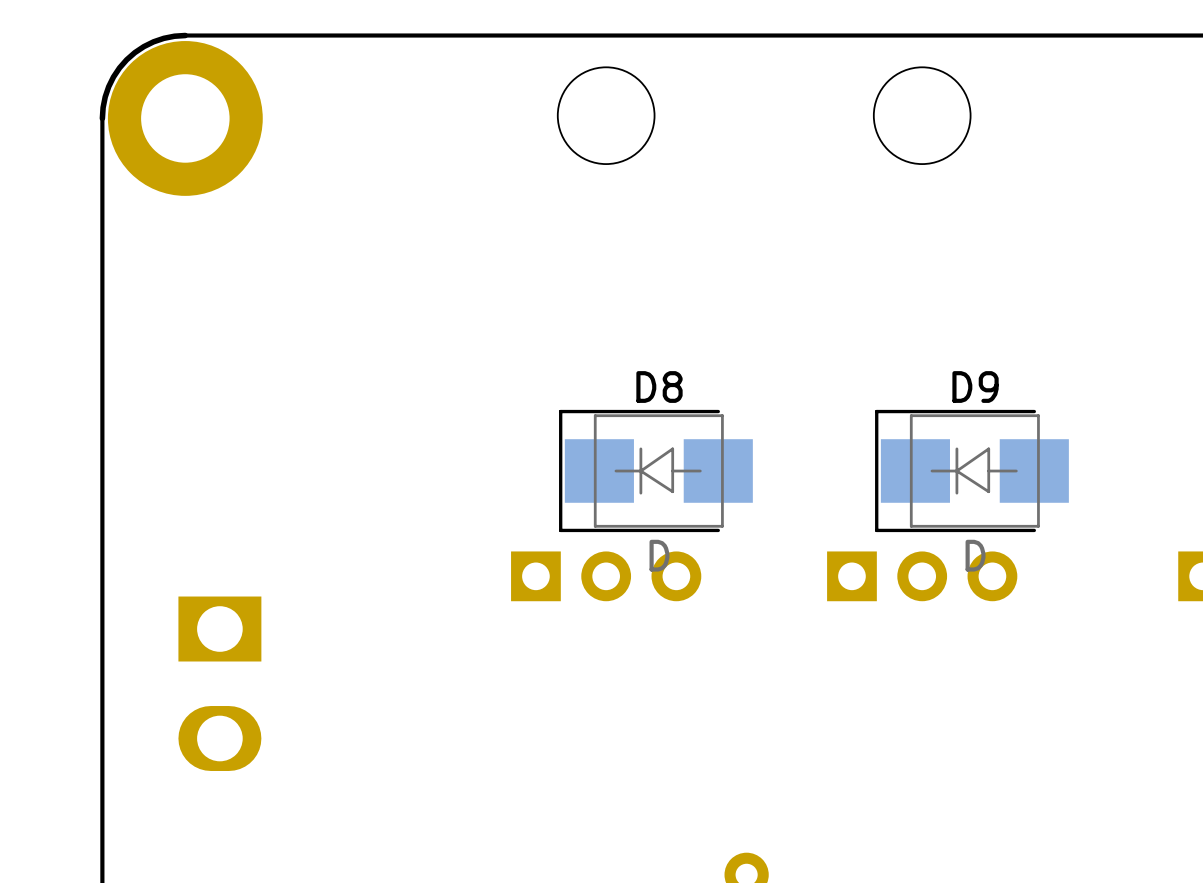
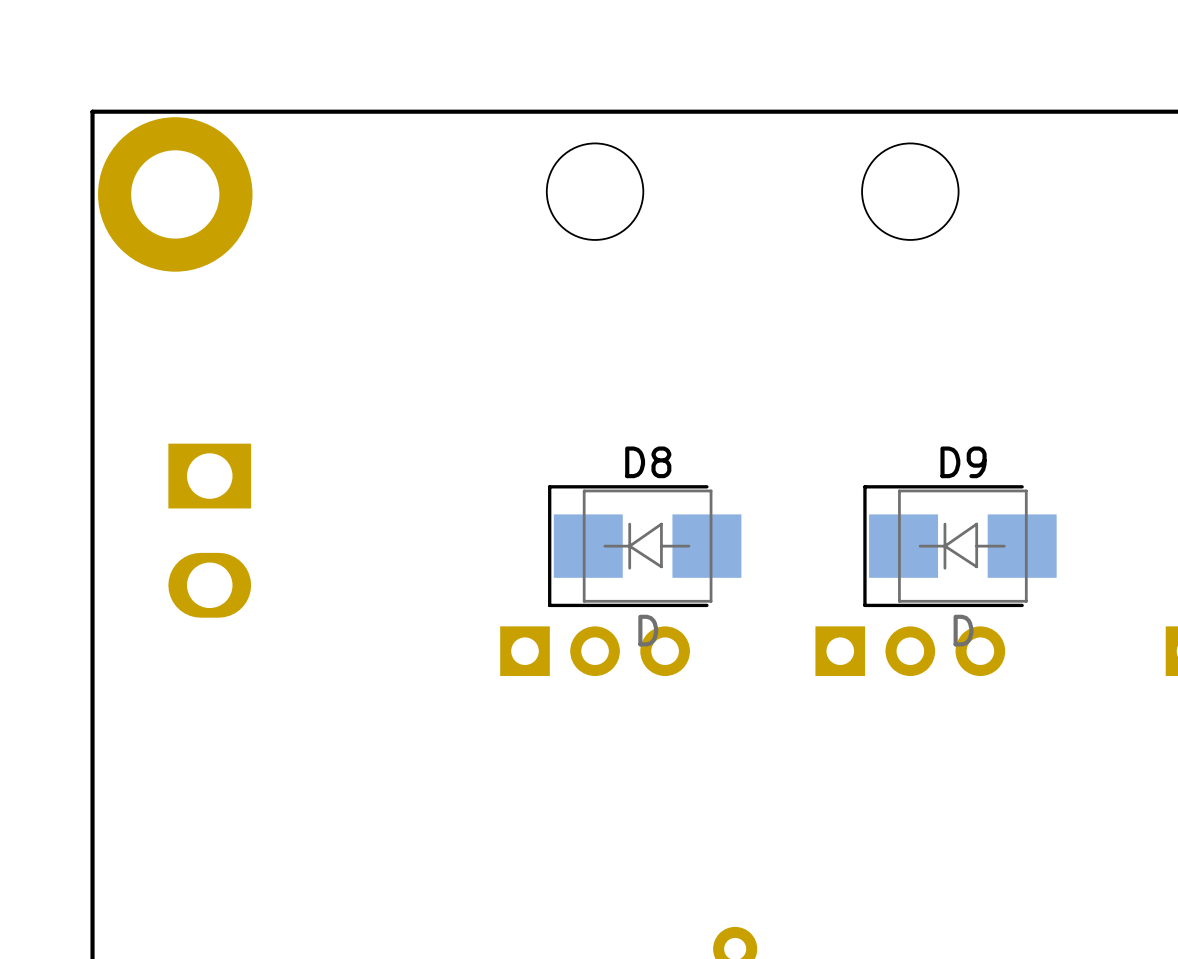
board edge: (185, 35) (153, 41) (126, 59) (108, 86) (102, 118) -> (175, 111) (92, 111) (92, 194)
part position: (219, 683) -> (209, 530)

